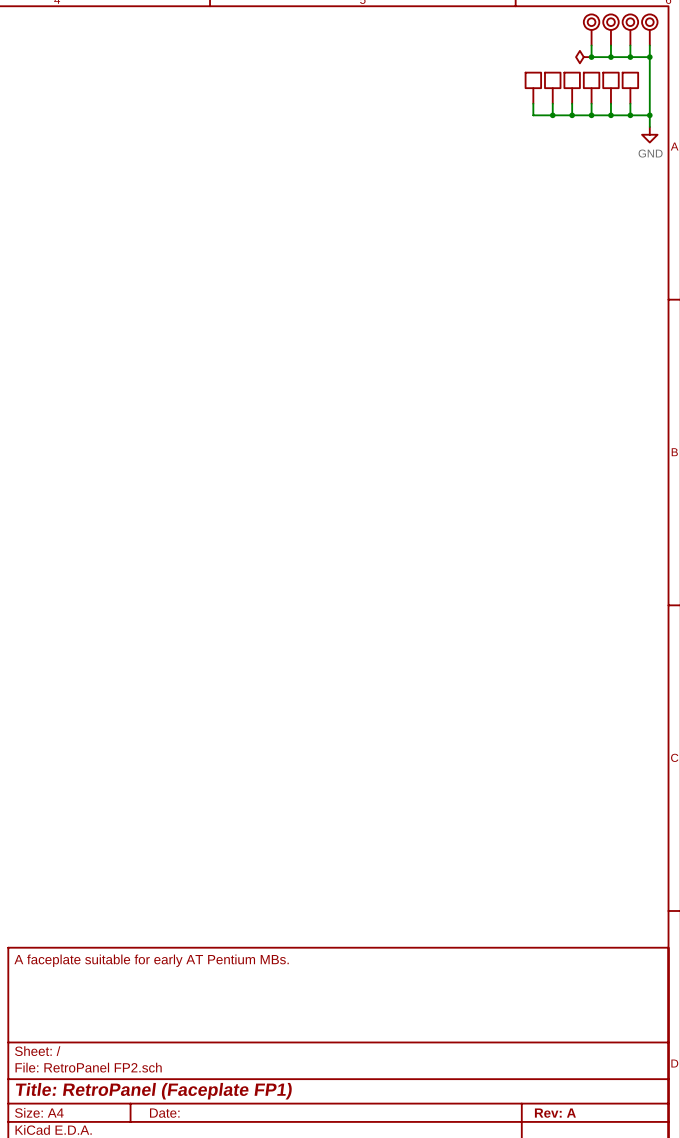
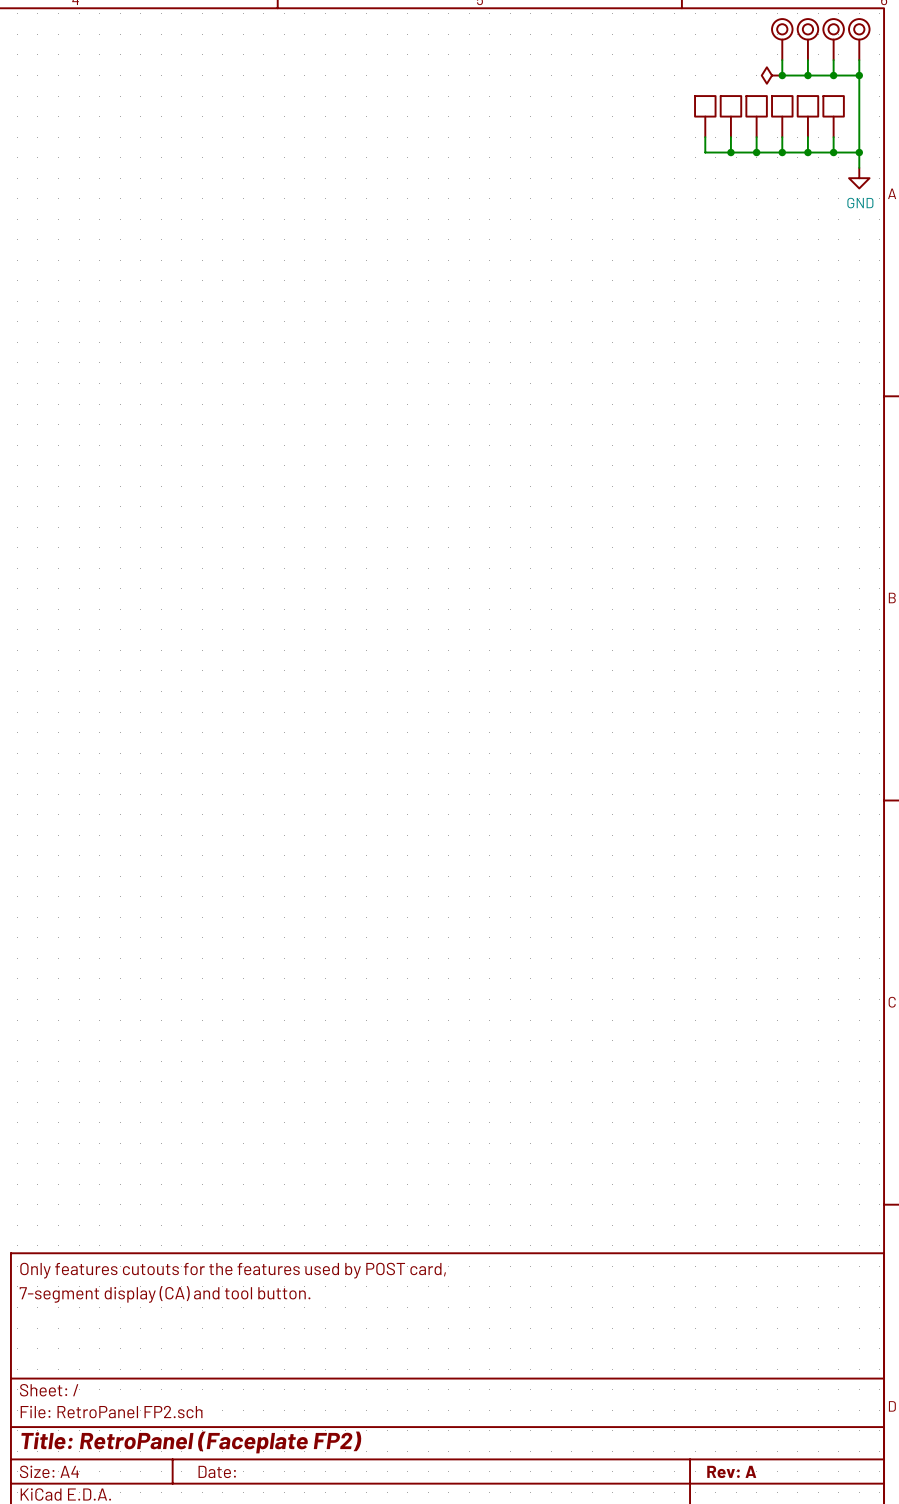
title block: A faceplate suitable for early AT Pentium MBs. (151, 960) -> Only features cutouts for the features used by POST card, (233, 1270)
title block: none -> 7-segment display (CA) and tool button. (165, 1294)
title block: Title: RetroPanel (Faceplate FP1) (153, 1091) -> Title: RetroPanel (Faceplate FP2) (191, 1442)

